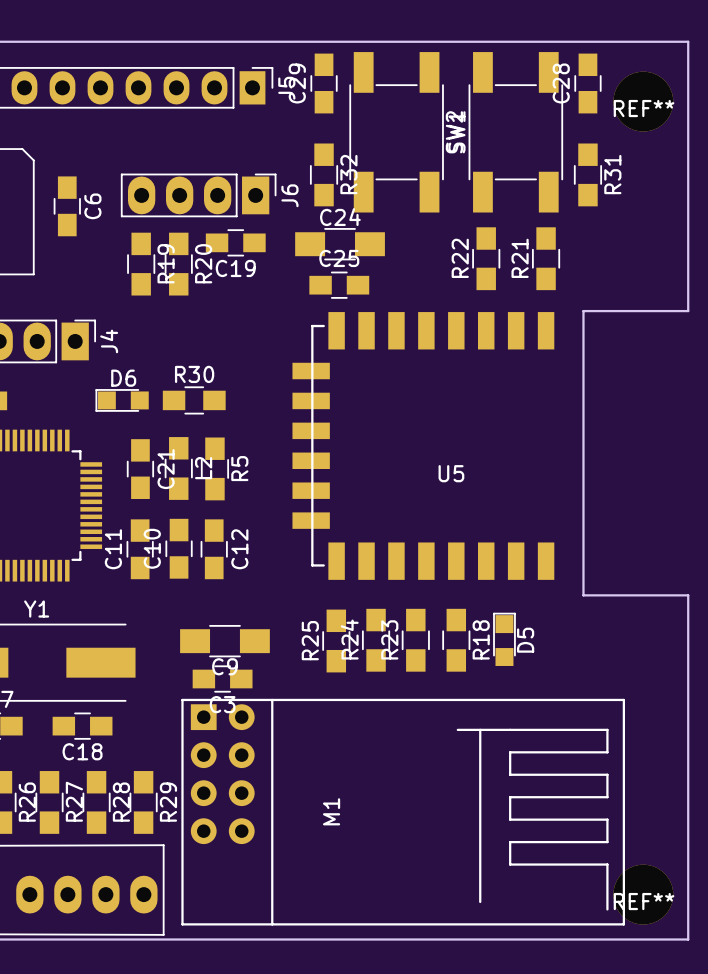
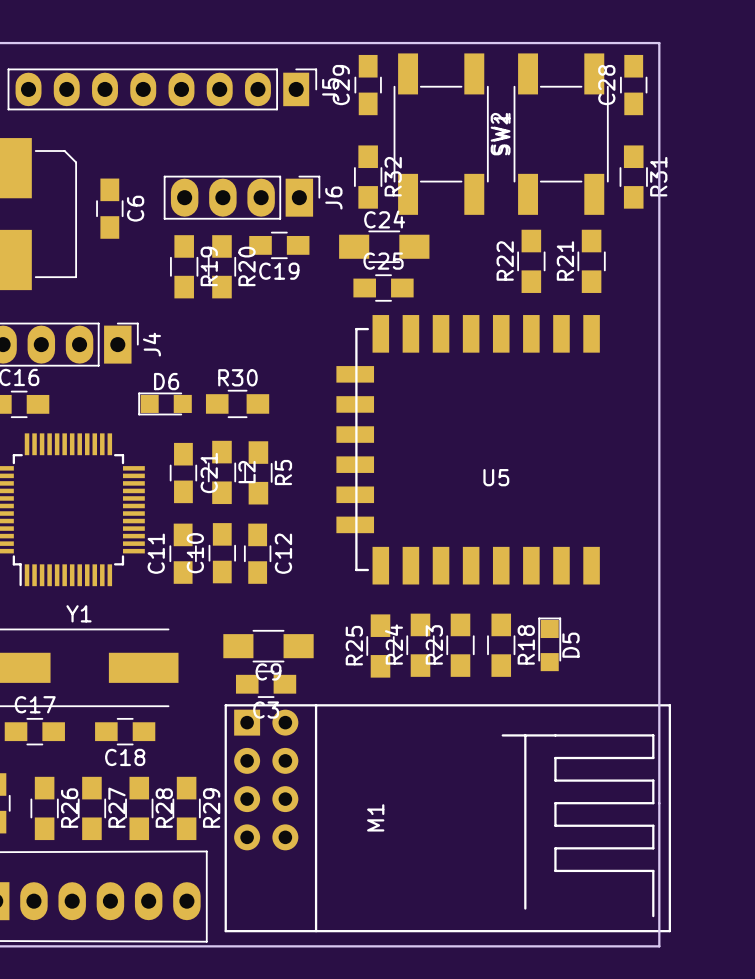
board edge: (613, 41) (688, 41) (688, 311) (583, 311) (583, 595) (688, 595) (688, 939) (613, 939) -> (659, 43) (659, 946)
REF**: (643, 101) -> none
REF**: (643, 894) -> none

